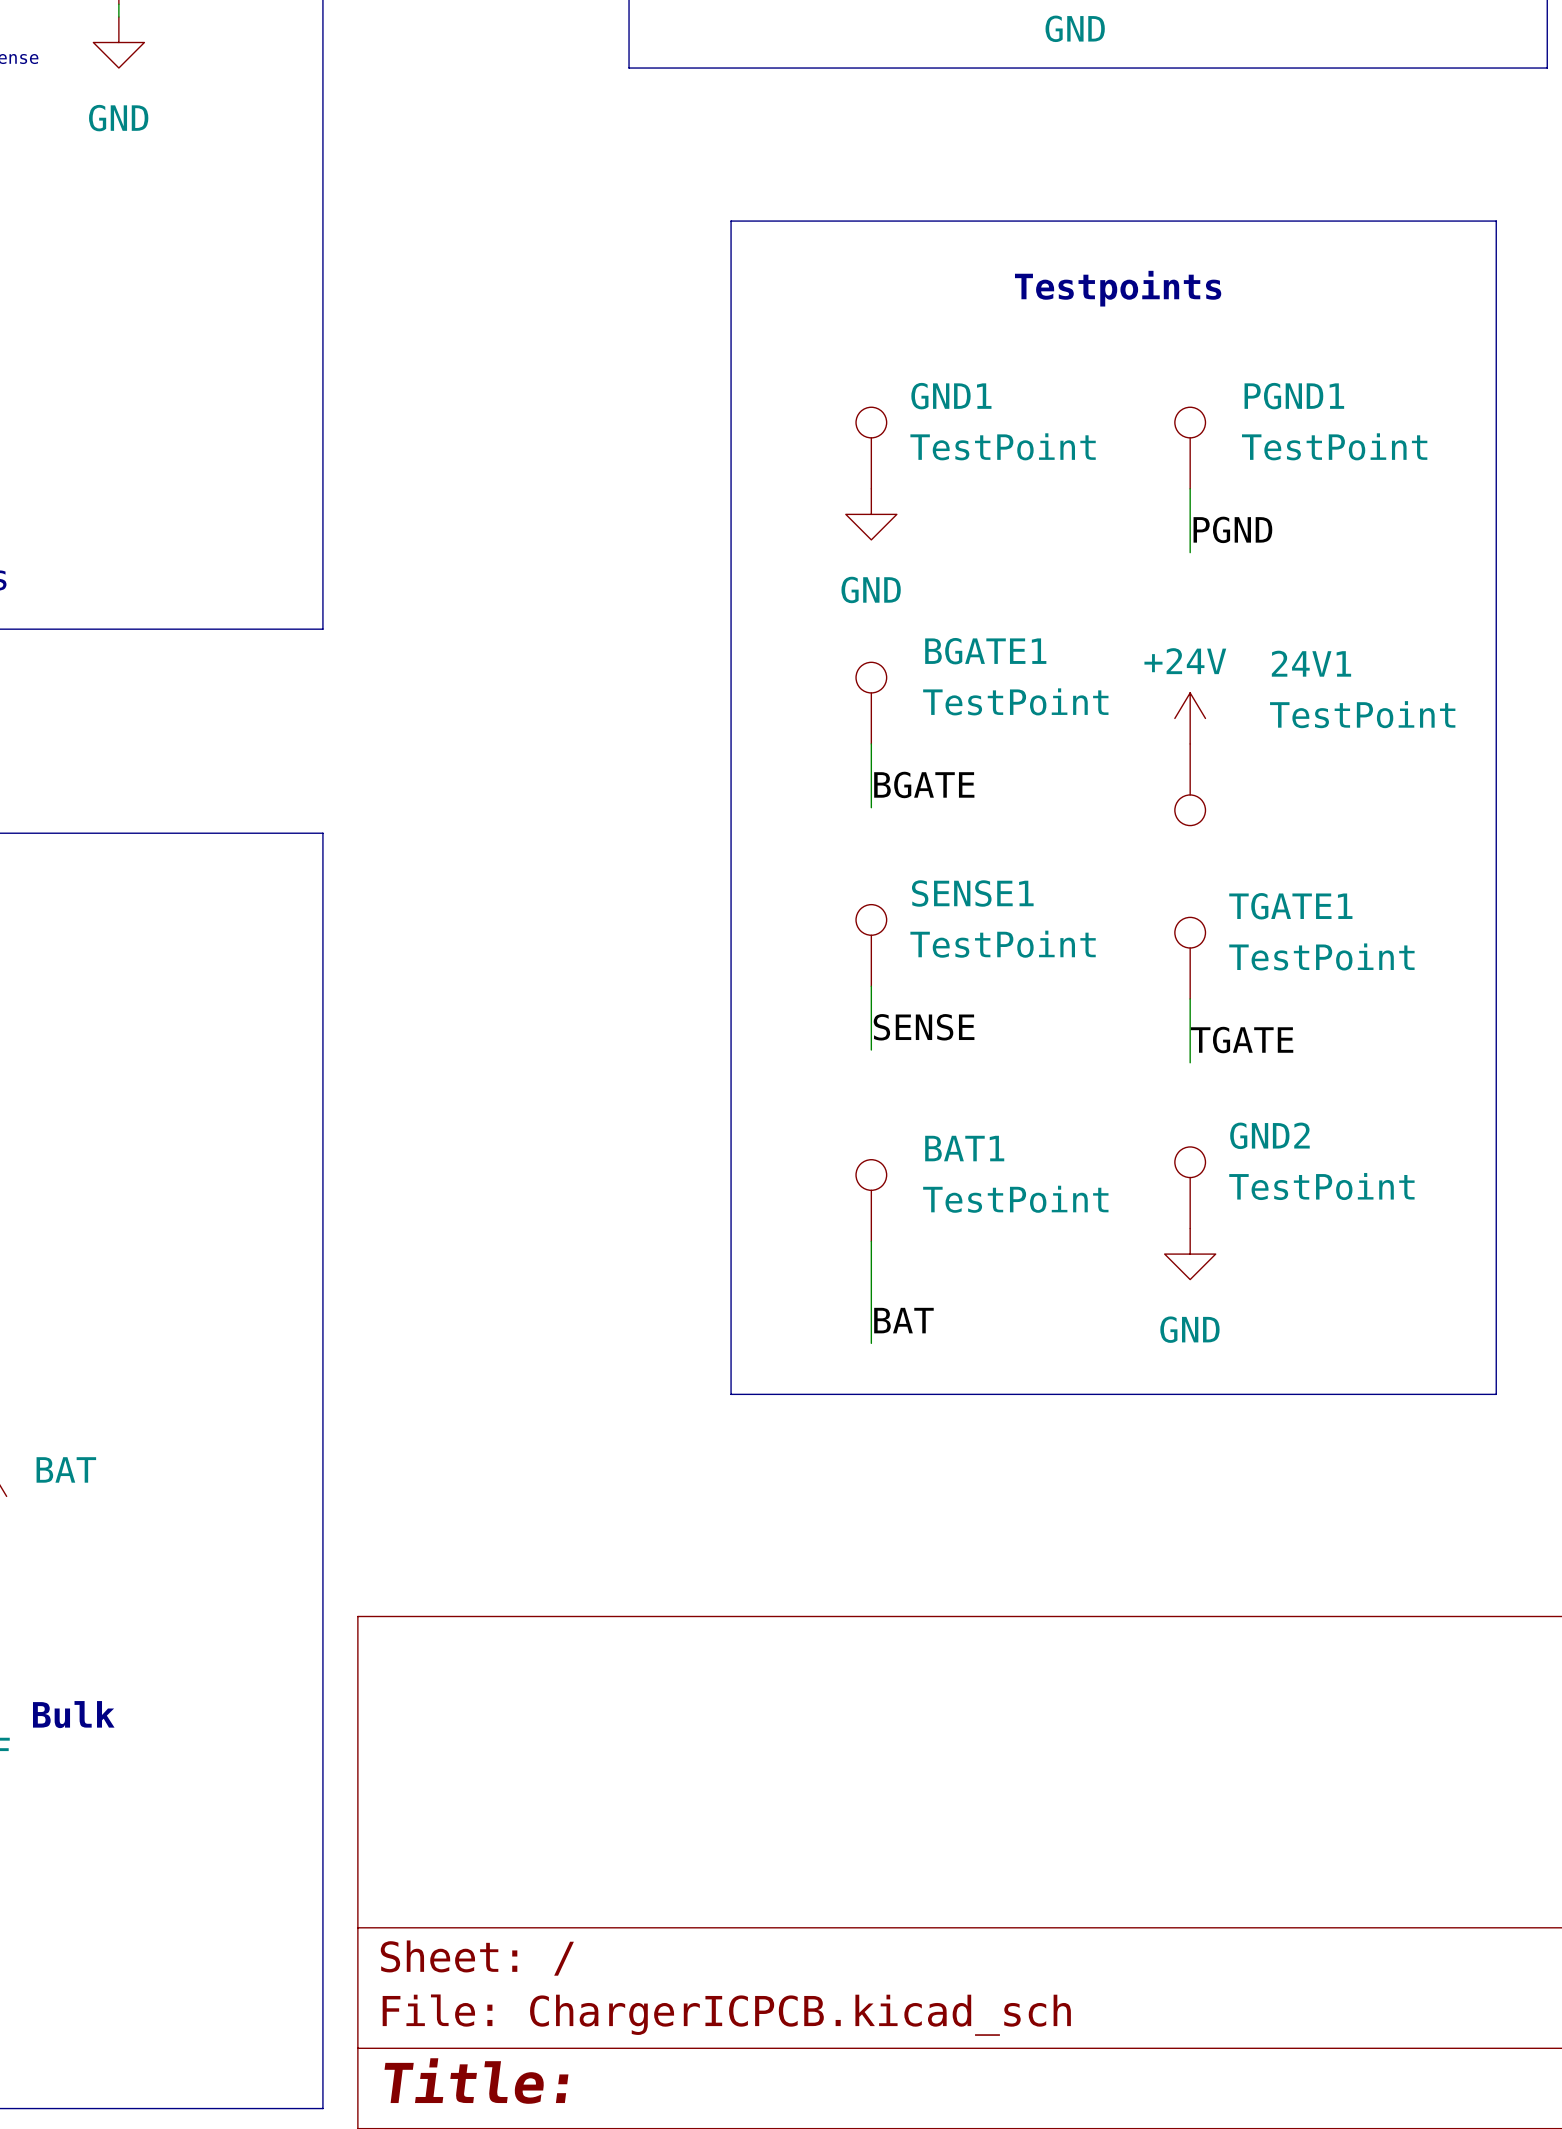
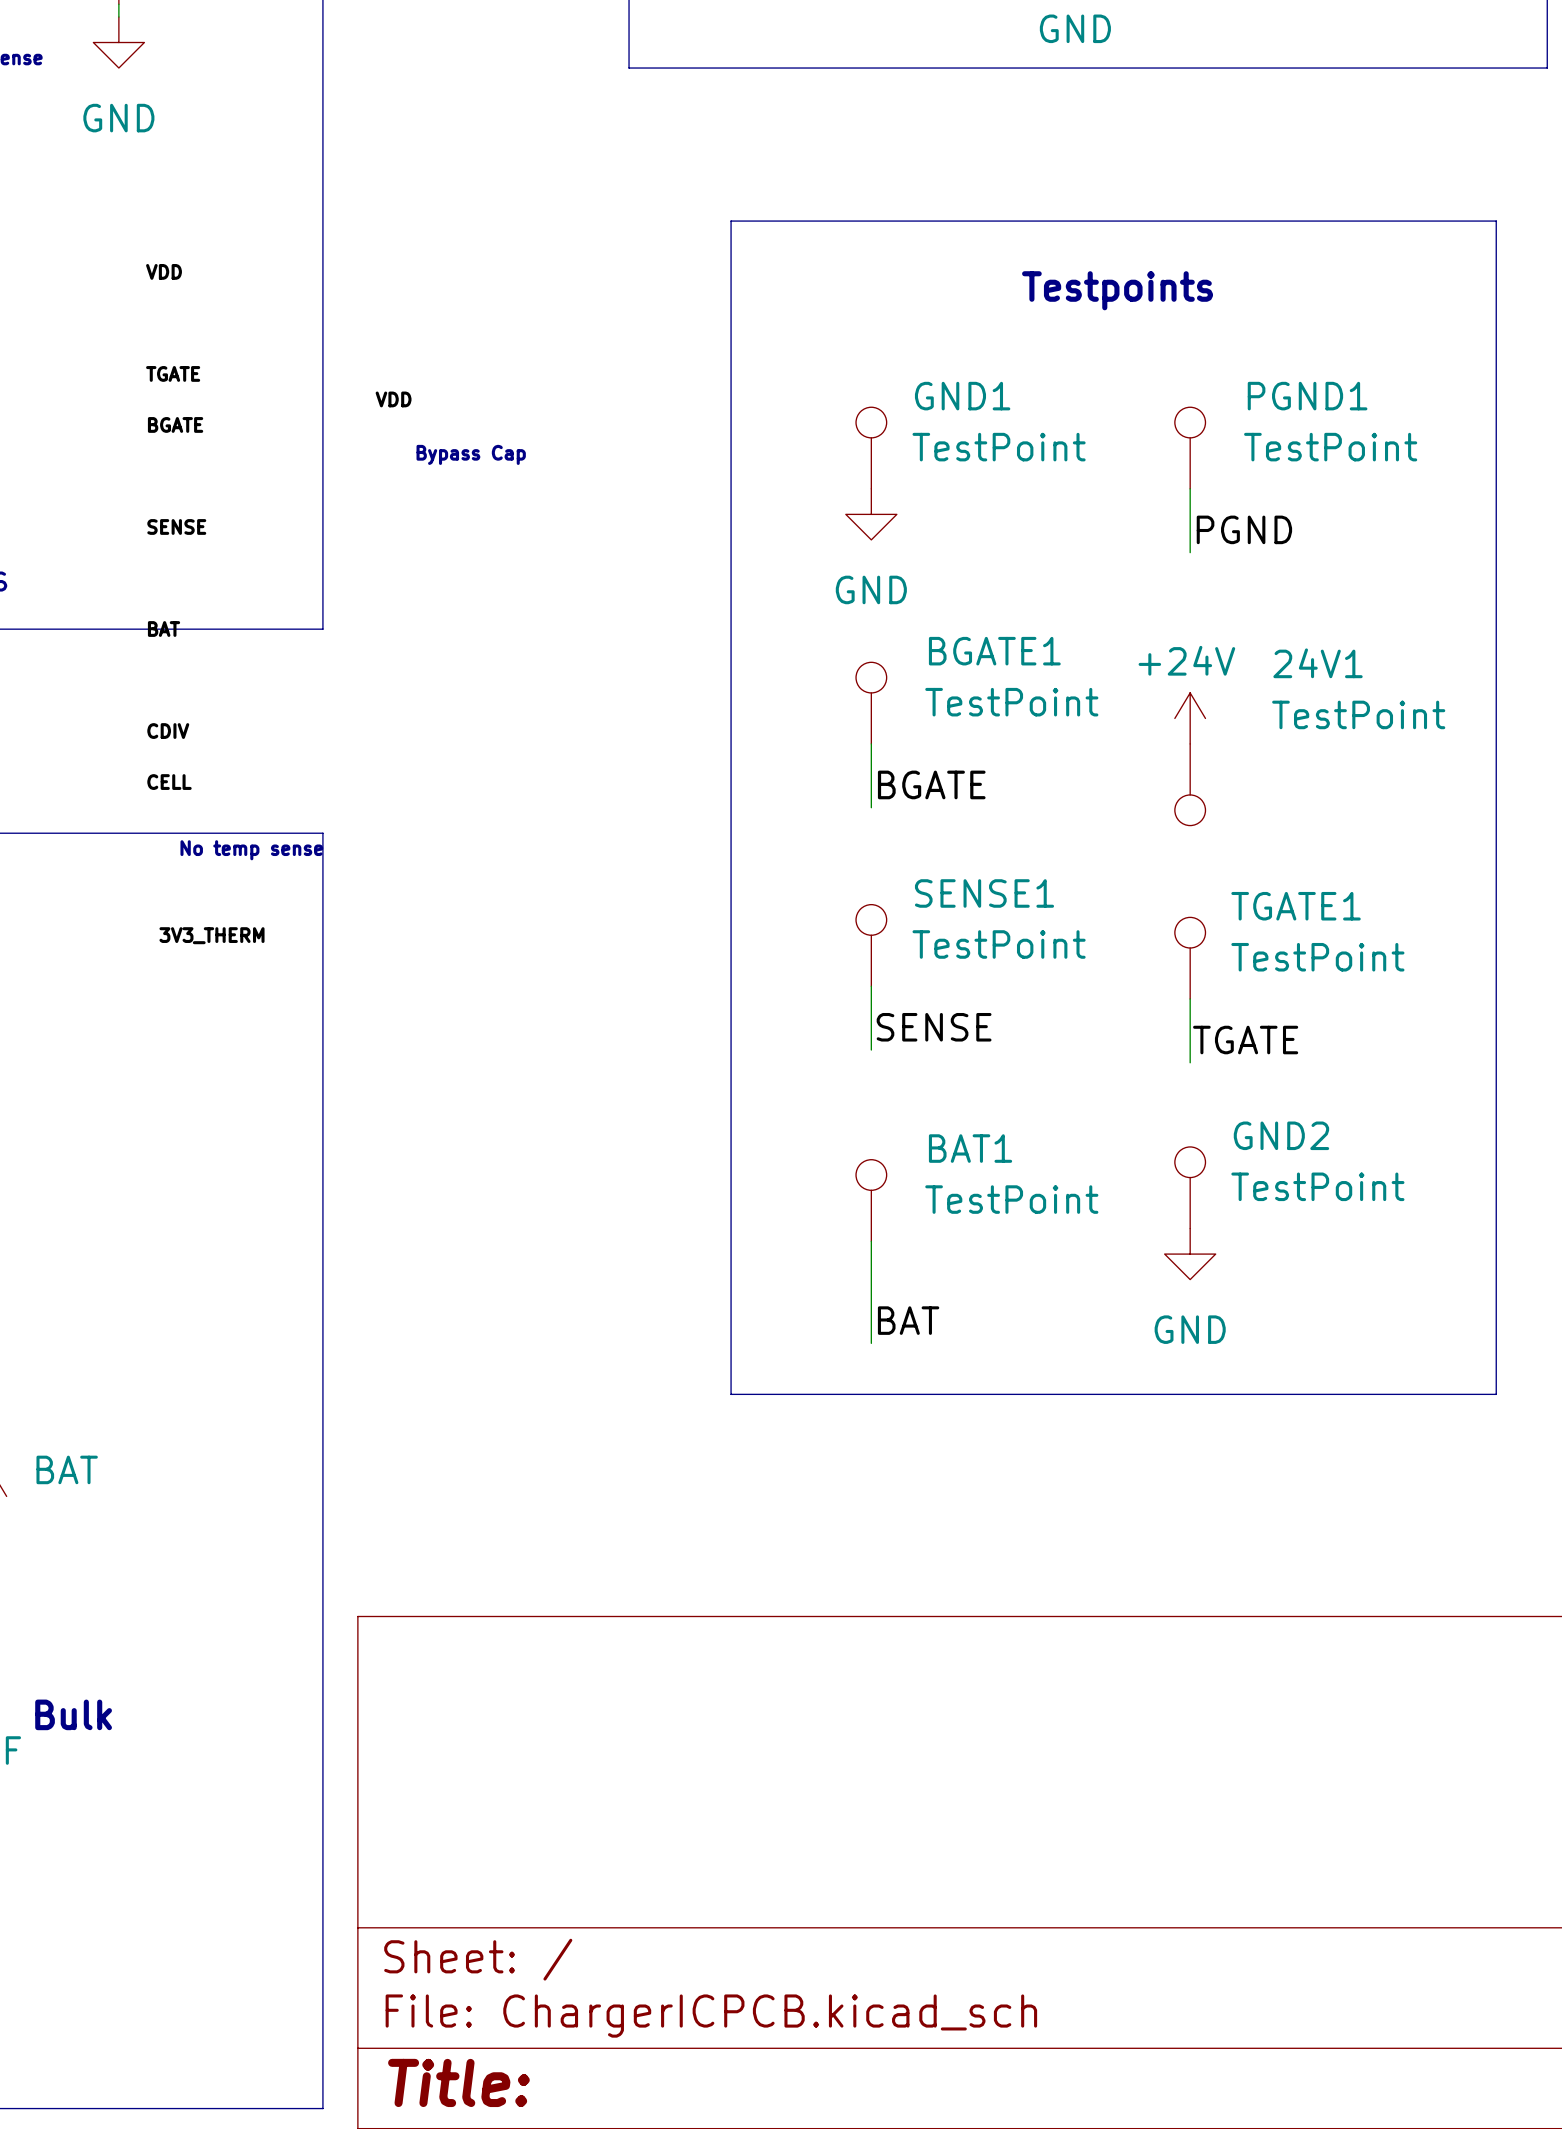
label: none -> VDD (164, 271)
label: none -> TGATE (173, 373)
label: none -> VDD (393, 399)
label: none -> BGATE (175, 424)
text: none -> Bypass Cap (471, 454)
label: none -> SENSE (176, 526)
label: none -> BAT (164, 629)
label: none -> CDIV (168, 731)
label: none -> CELL (169, 782)
text: none -> No temp sense (251, 850)
label: none -> 3V3_THERM (212, 935)

